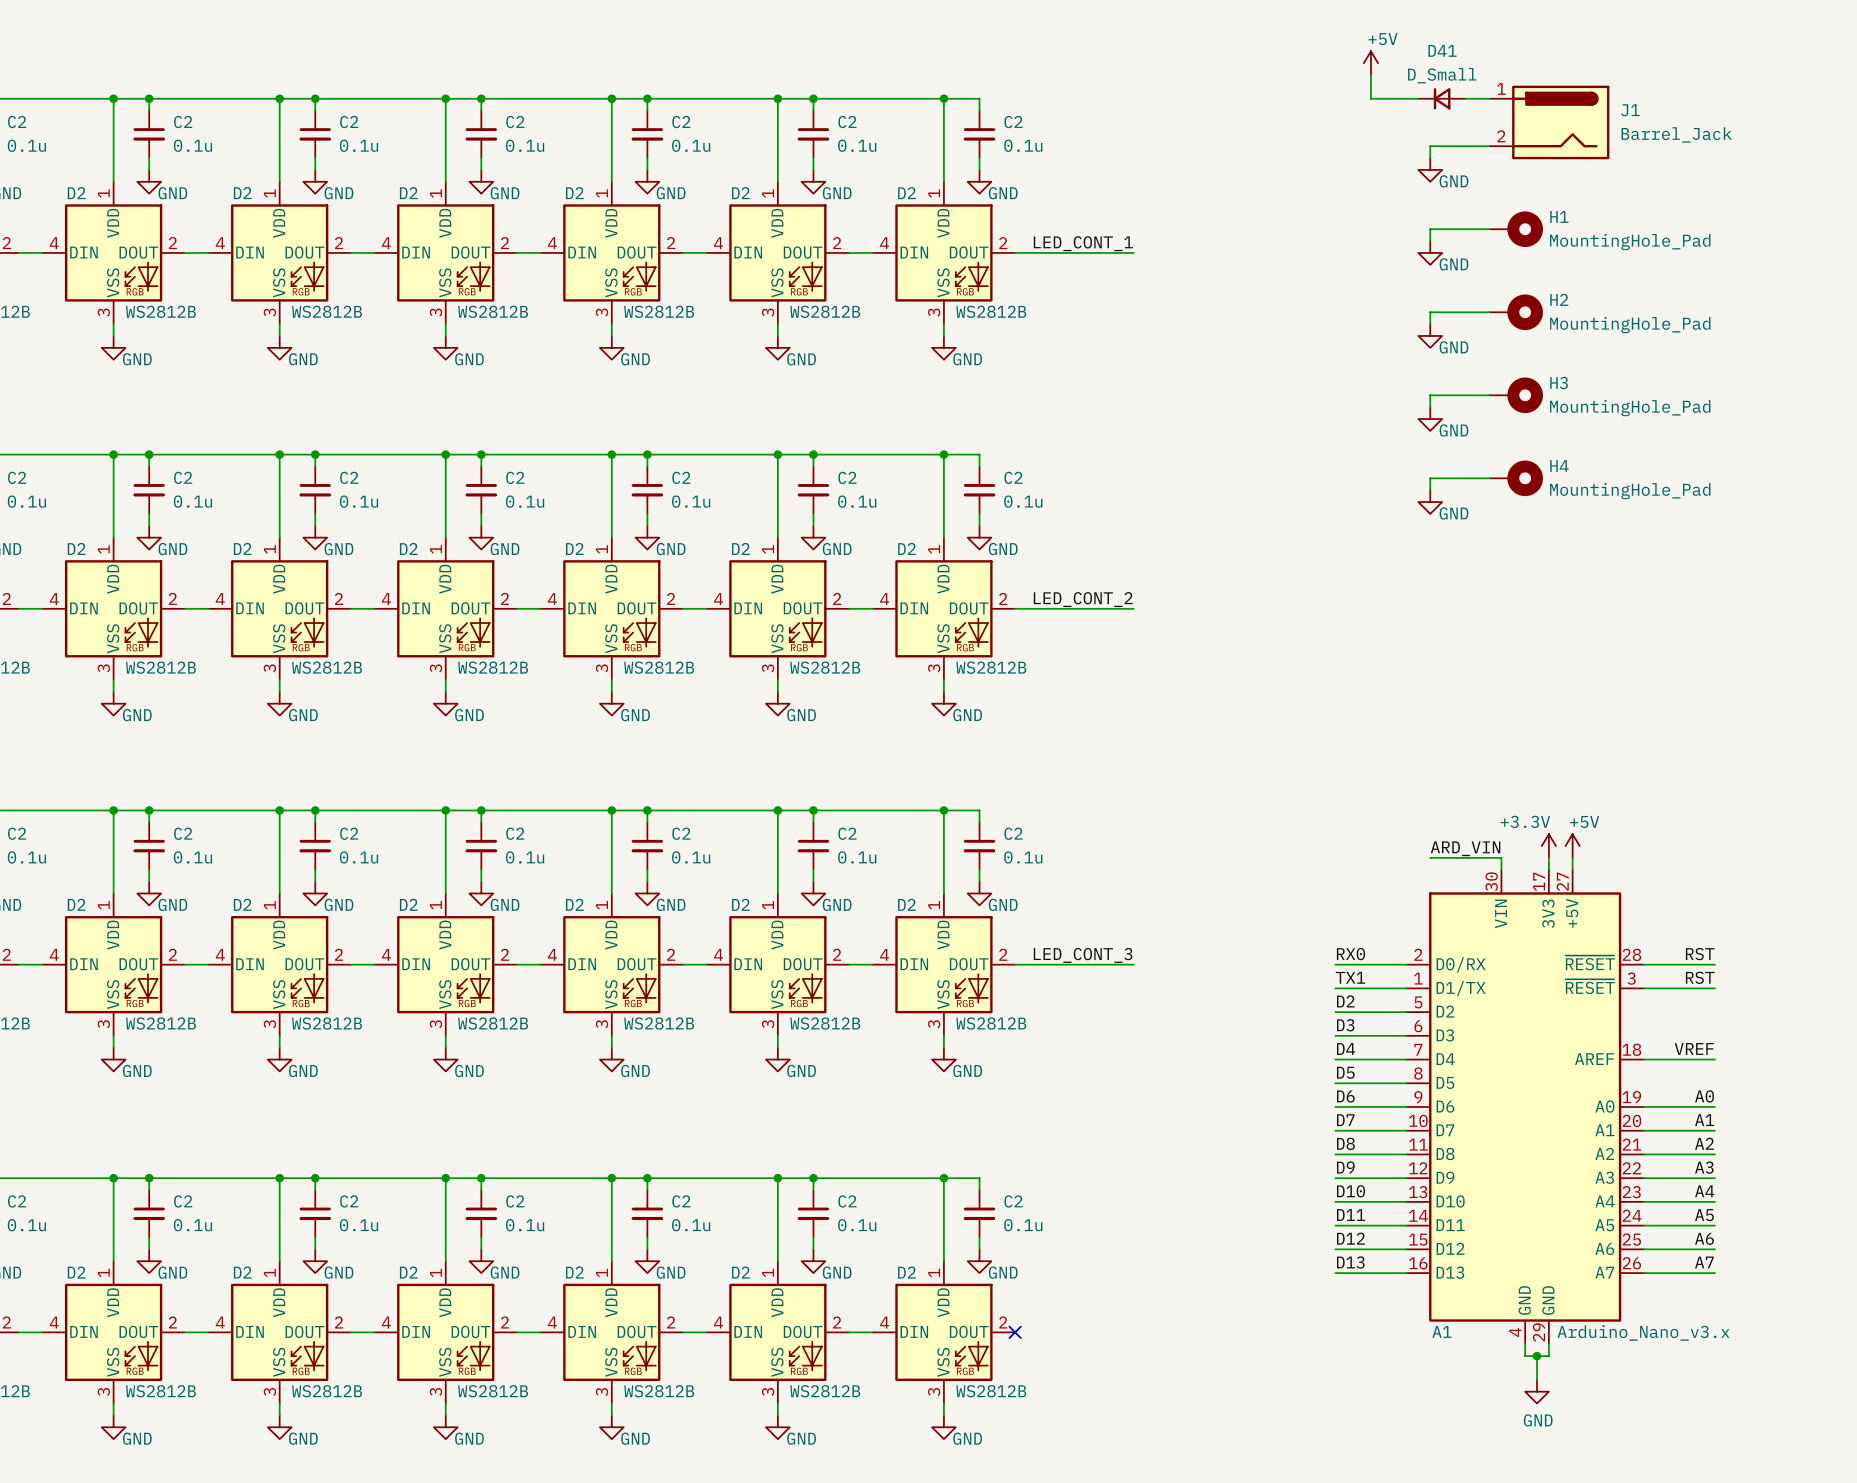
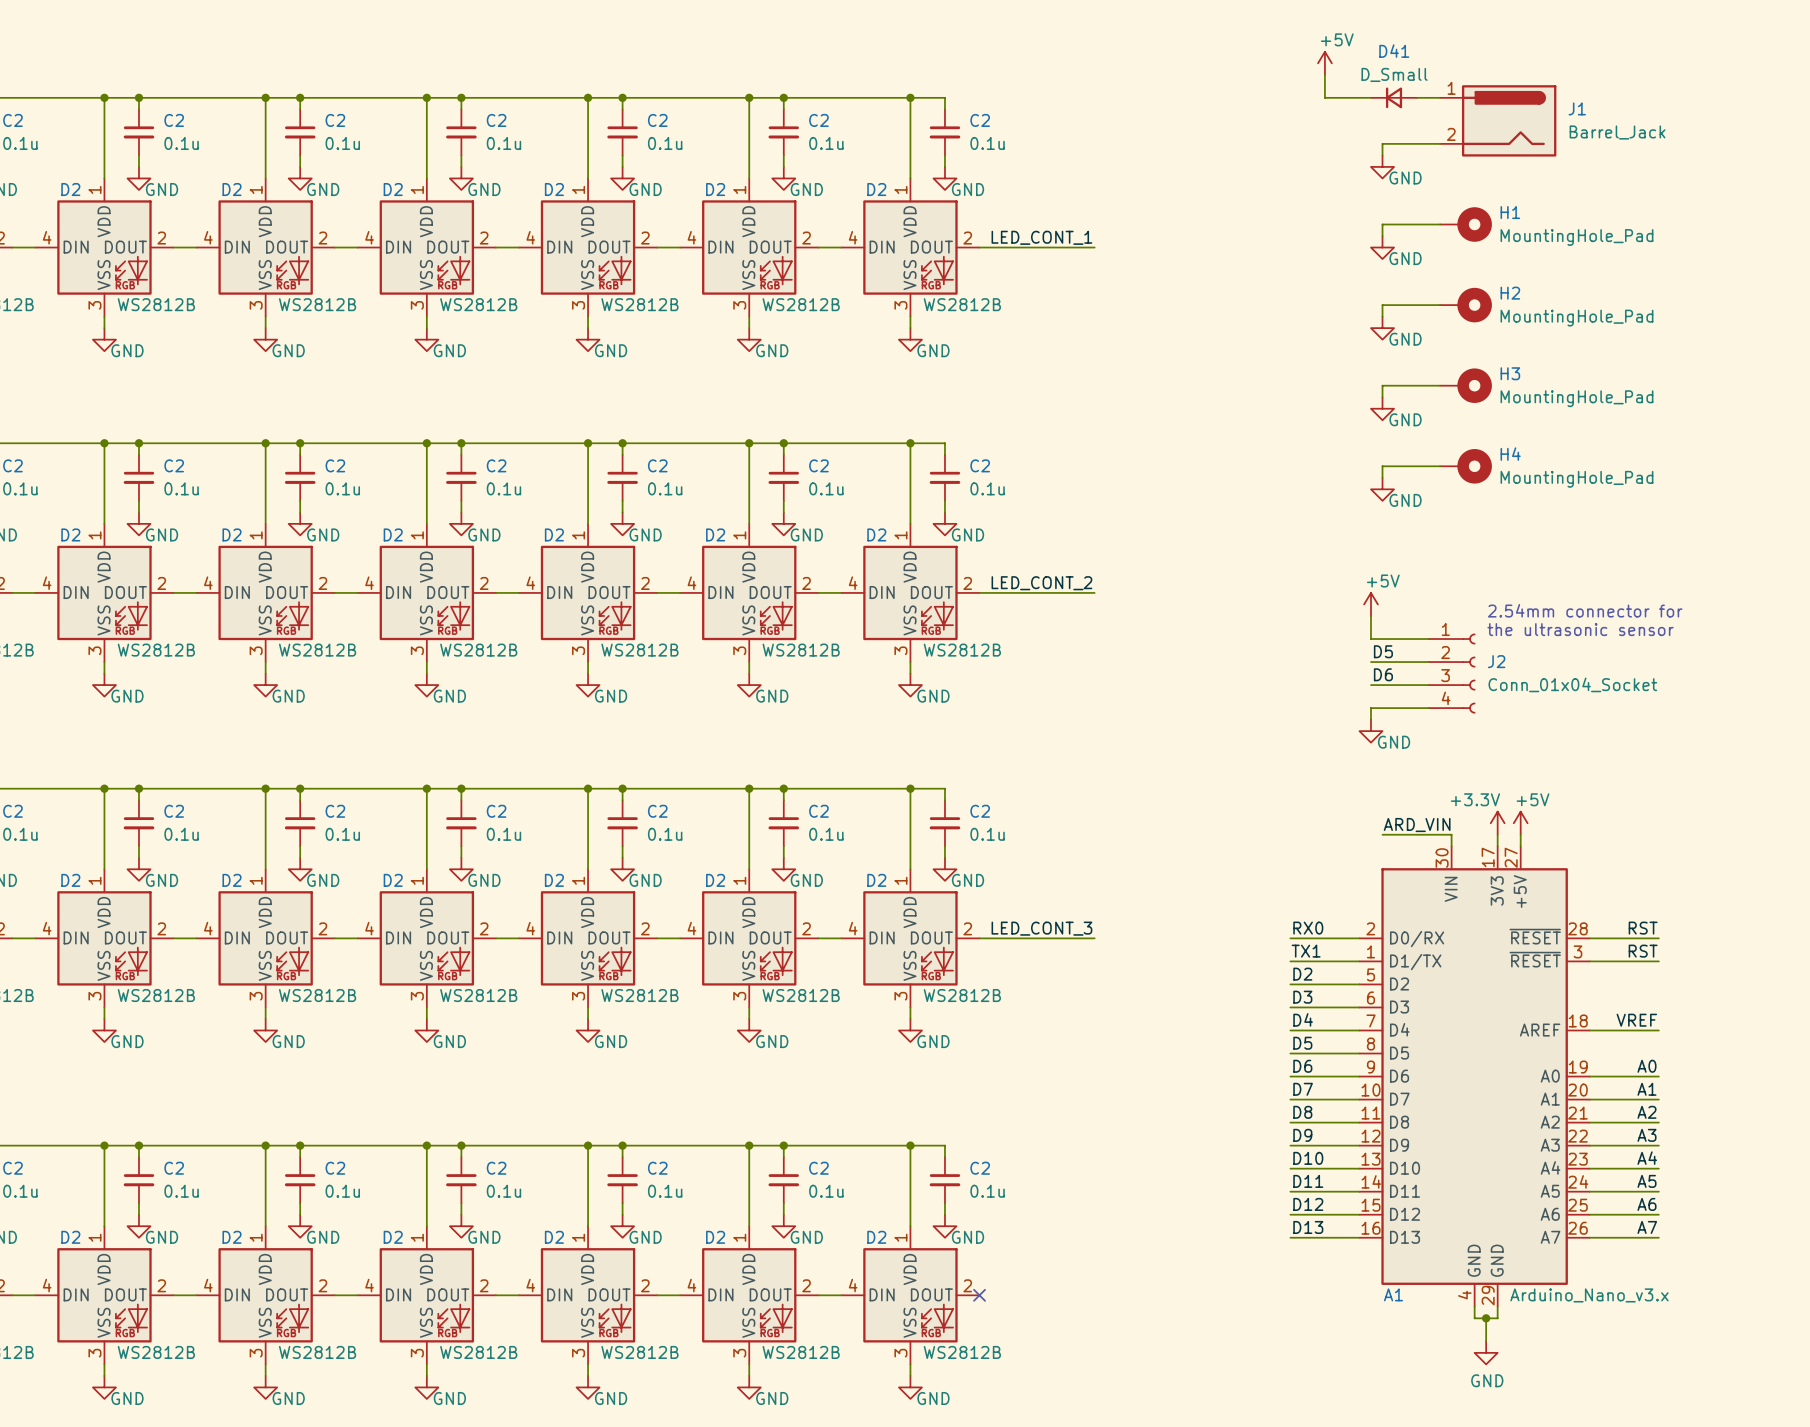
power symbol: none -> +5V (1371, 604)
text: none -> 2.54mm connector for (1585, 610)
wire: none -> (1371, 615) (1371, 639) (1428, 639)
text: none -> the ultrasonic sensor (1580, 629)
label: none -> D5 (1383, 651)
wire: none -> (1371, 662) (1428, 662)
J2: none -> Conn_01x04_Socket (1451, 673)
label: none -> D6 (1383, 674)
wire: none -> (1371, 685) (1428, 685)
wire: none -> (1428, 708) (1371, 708) (1371, 719)
power symbol: none -> GND (1371, 731)

